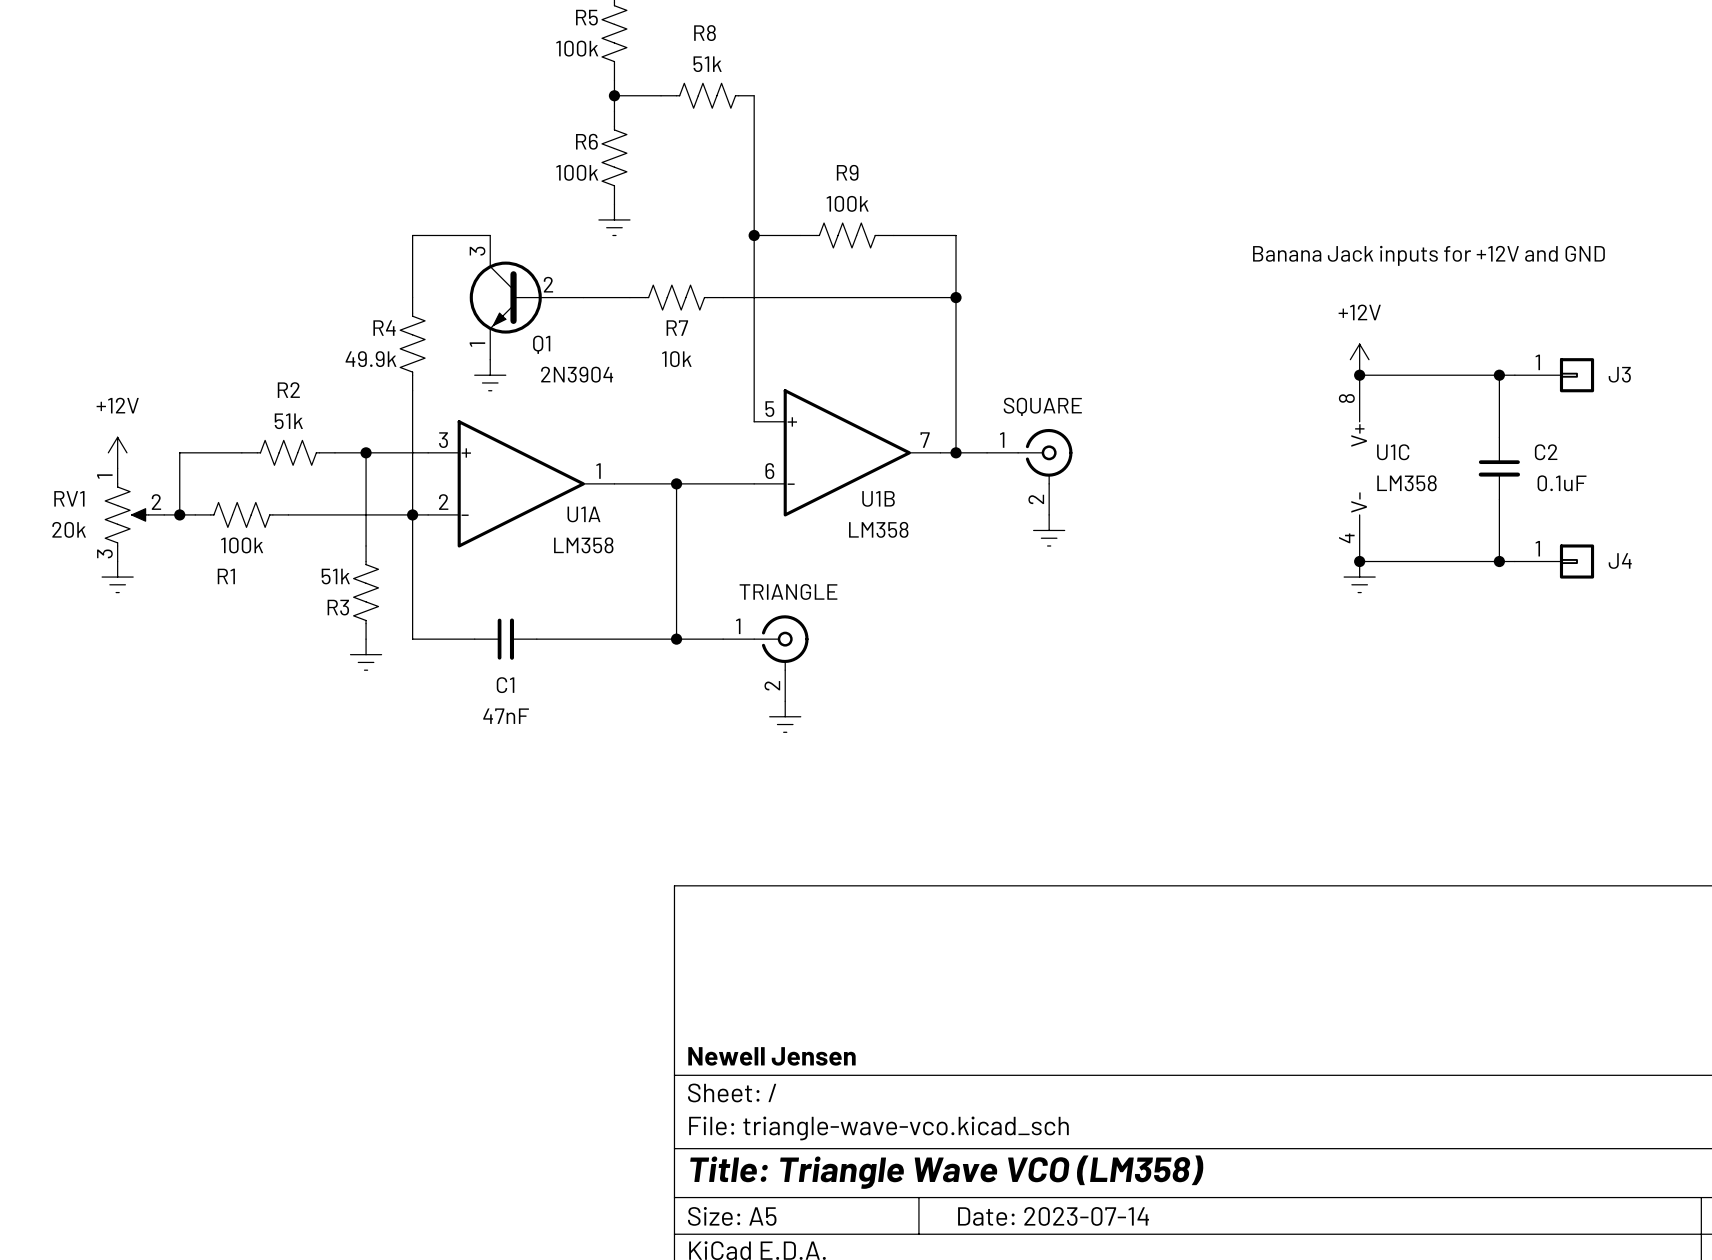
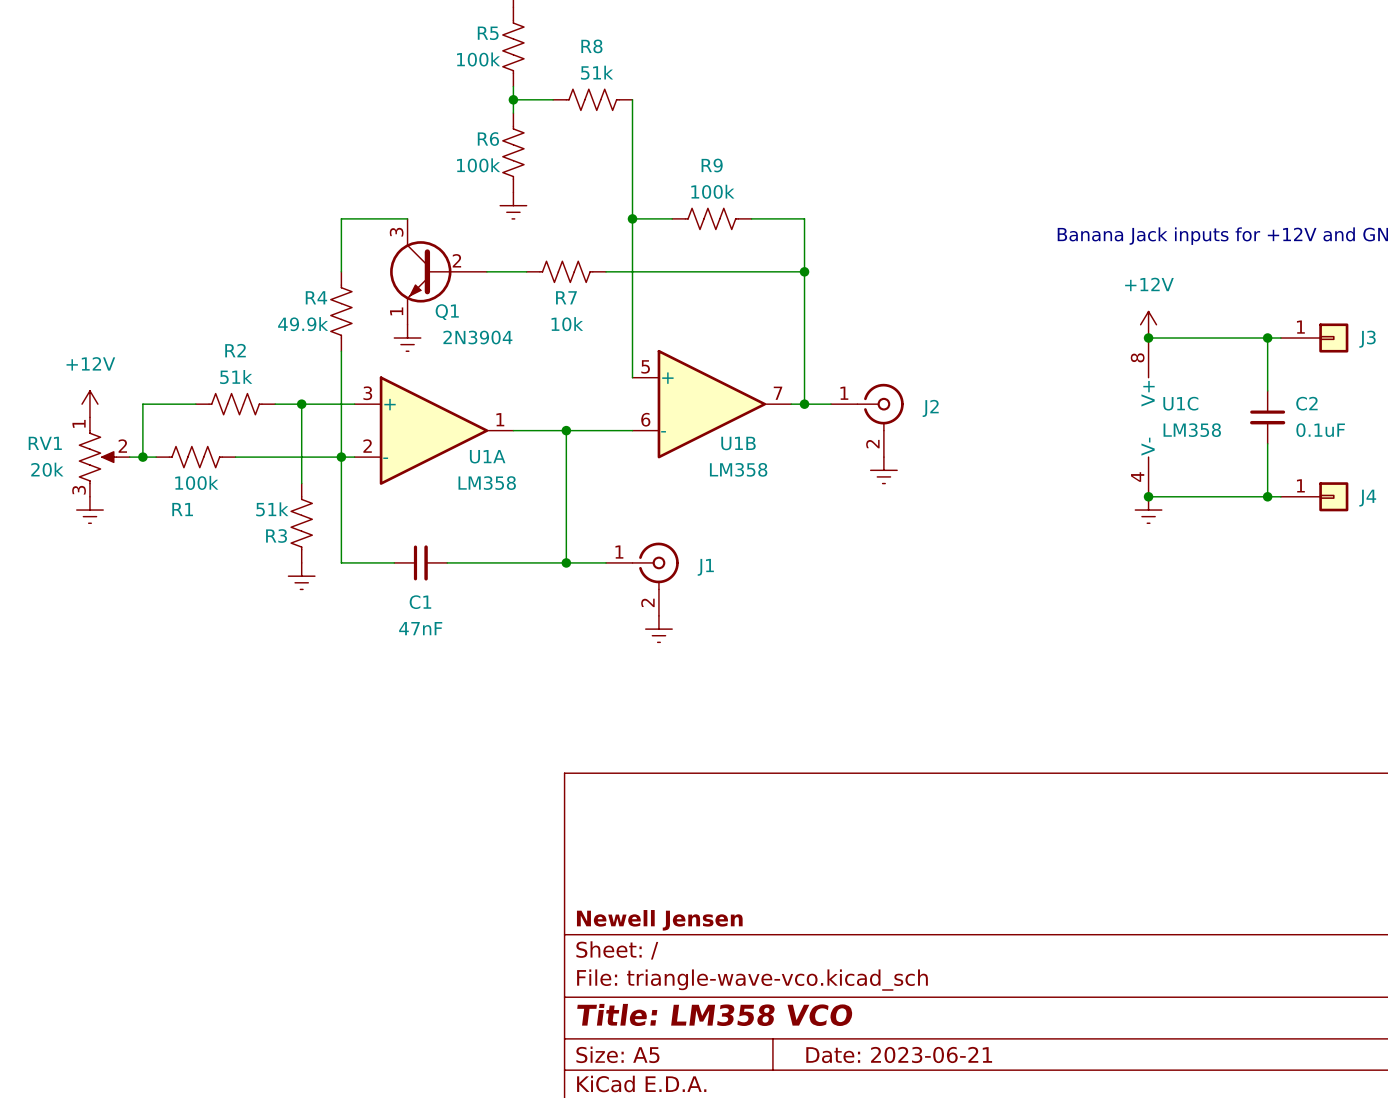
SQUARE name: SQUARE (1042, 406) -> J2 (930, 408)
TRIANGLE name: TRIANGLE (788, 591) -> J1 (705, 567)
title block: Title: Triangle Wave VCO (LM358) (946, 1172) -> Title: LM358 VCO (714, 1014)
title block: Date: 2023-07-14 (1053, 1216) -> Date: 2023-06-21 (899, 1054)

